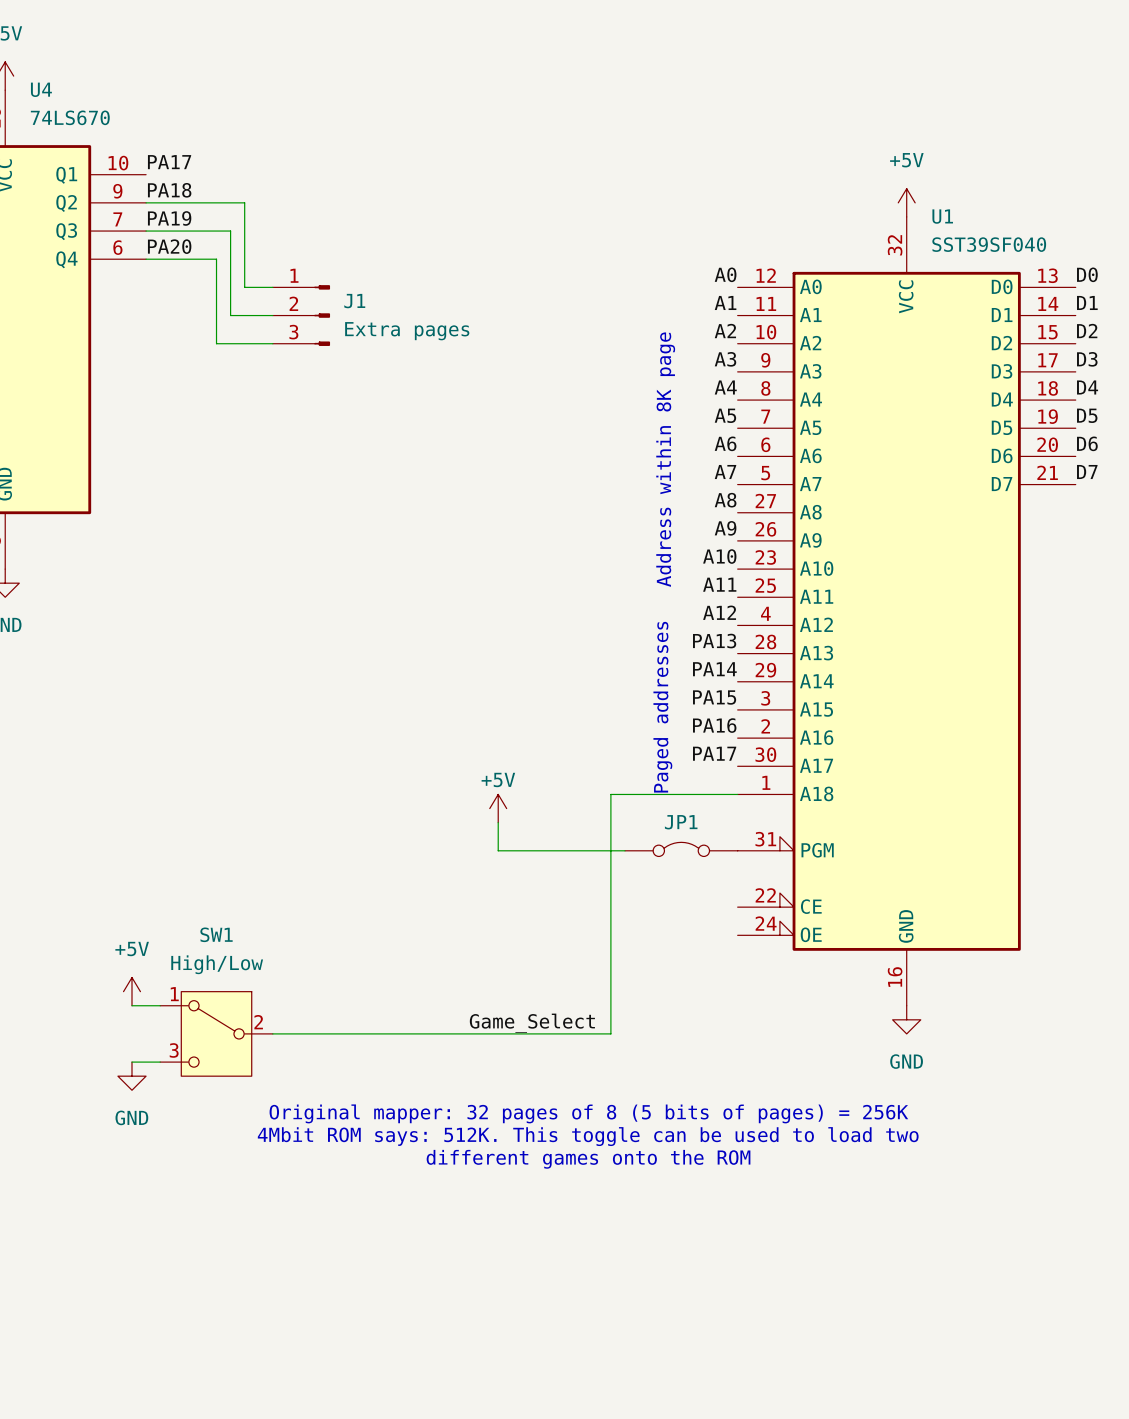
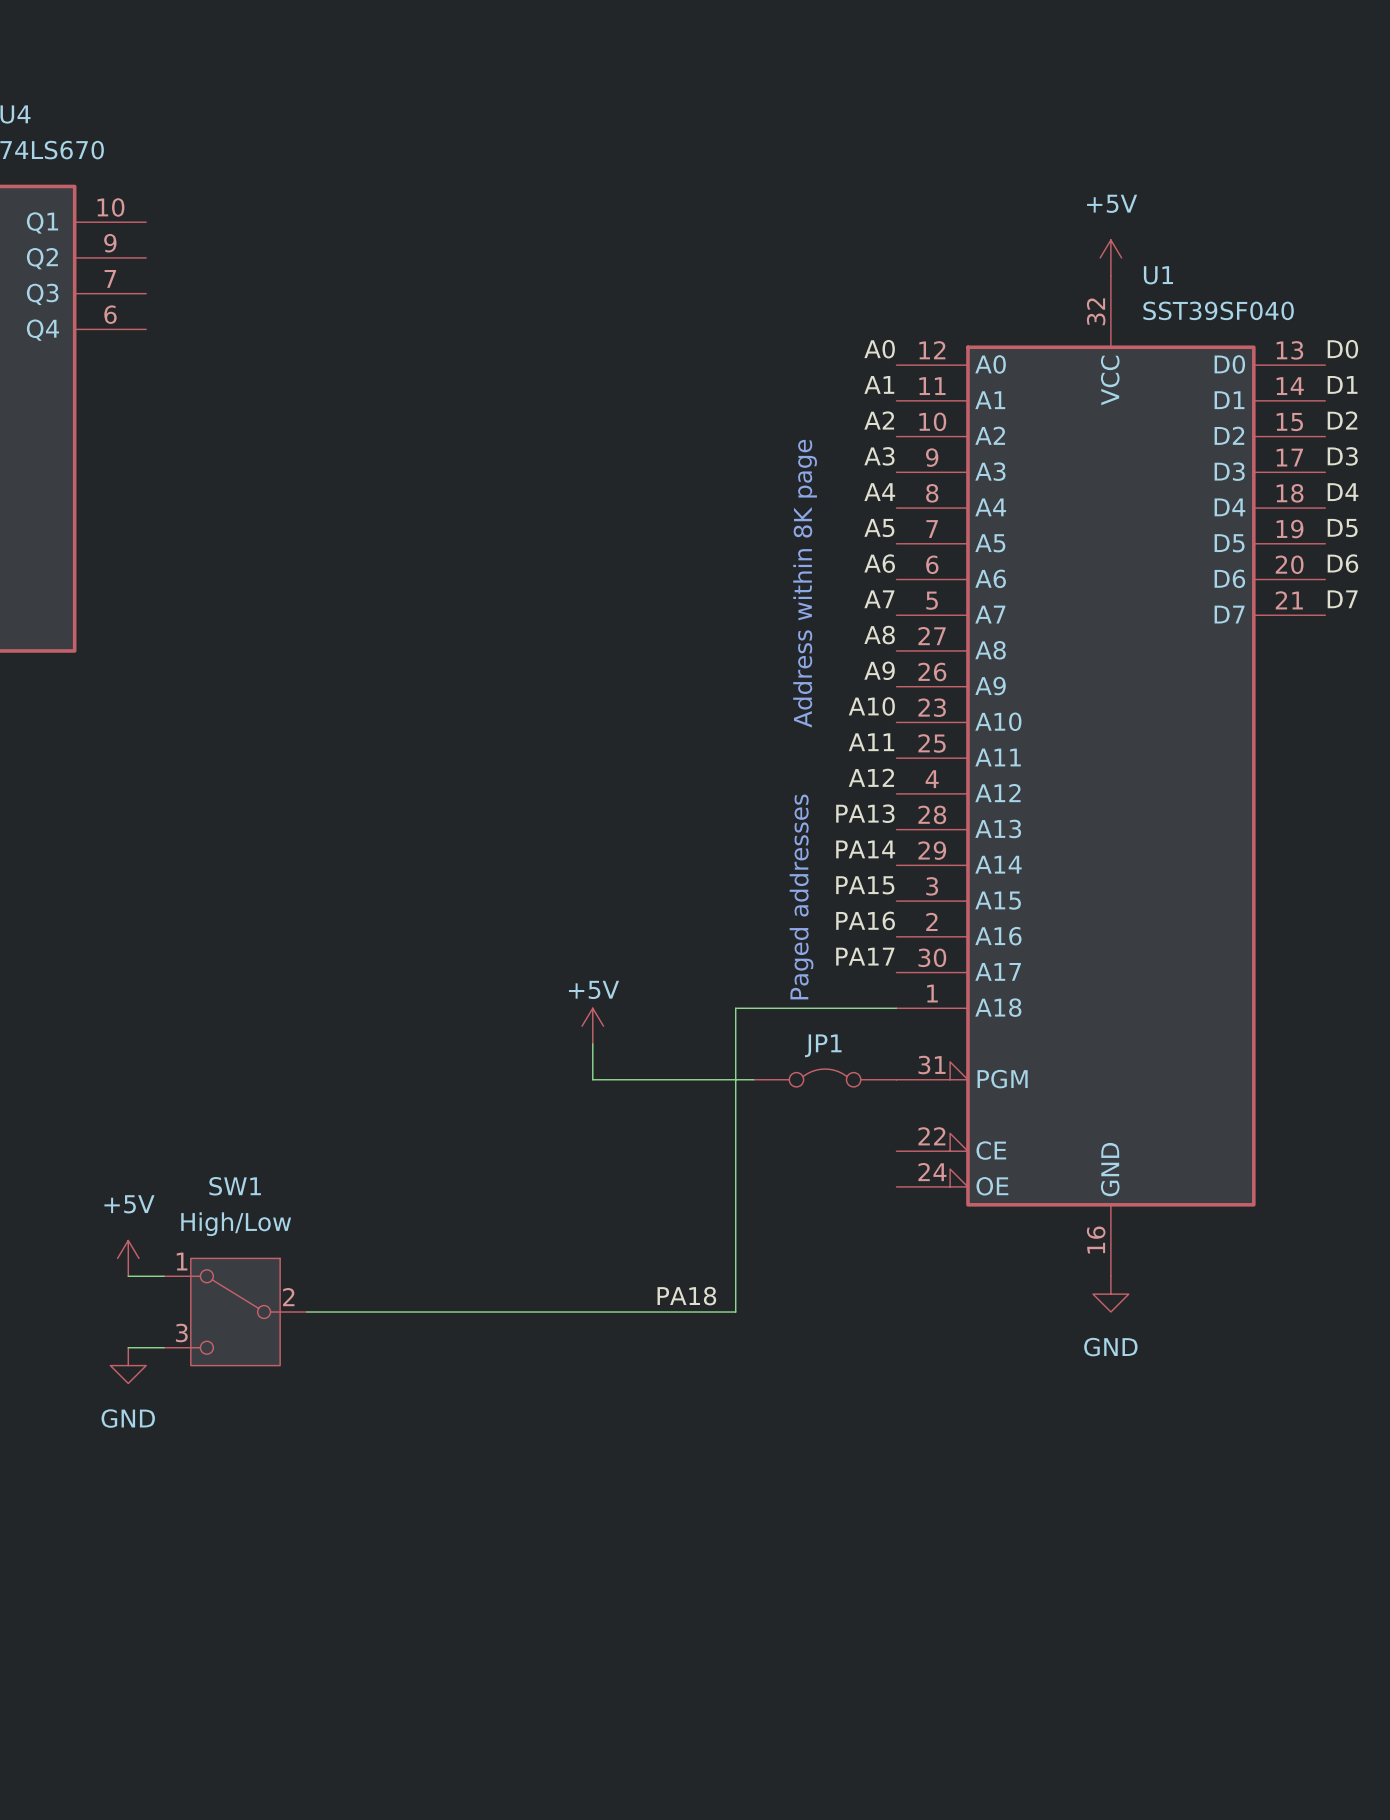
label: PA17 (169, 162) -> none
label: PA18 (169, 190) -> none
wire: (146, 202) (244, 202) (244, 287) (272, 287) -> none
label: PA19 (169, 218) -> none
wire: (146, 231) (230, 231) (230, 315) (272, 315) -> none
label: PA20 (169, 246) -> none
wire: (146, 259) (216, 259) (216, 343) (272, 343) -> none
J1: Extra pages (301, 315) -> none
label: Game_Select (532, 1023) -> PA18 (686, 1296)
text: Original mapper: 32 pages of 8 (5 bits of pages) = 256K (588, 1113) -> none
text: 4Mbit ROM says: 512K. This toggle can be used to load two (588, 1136) -> none
text: different games onto the ROM (588, 1159) -> none

